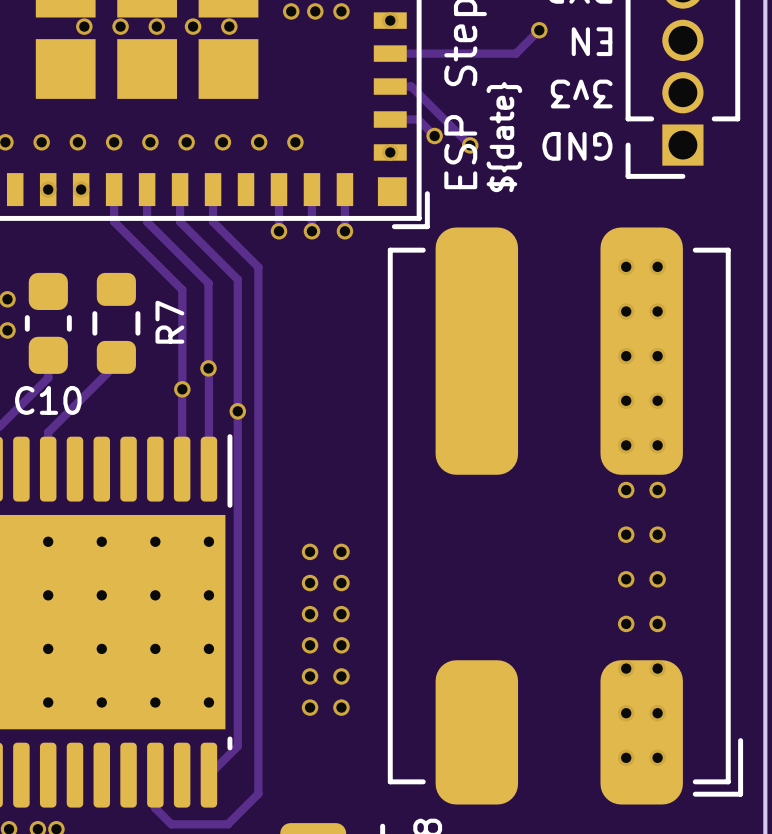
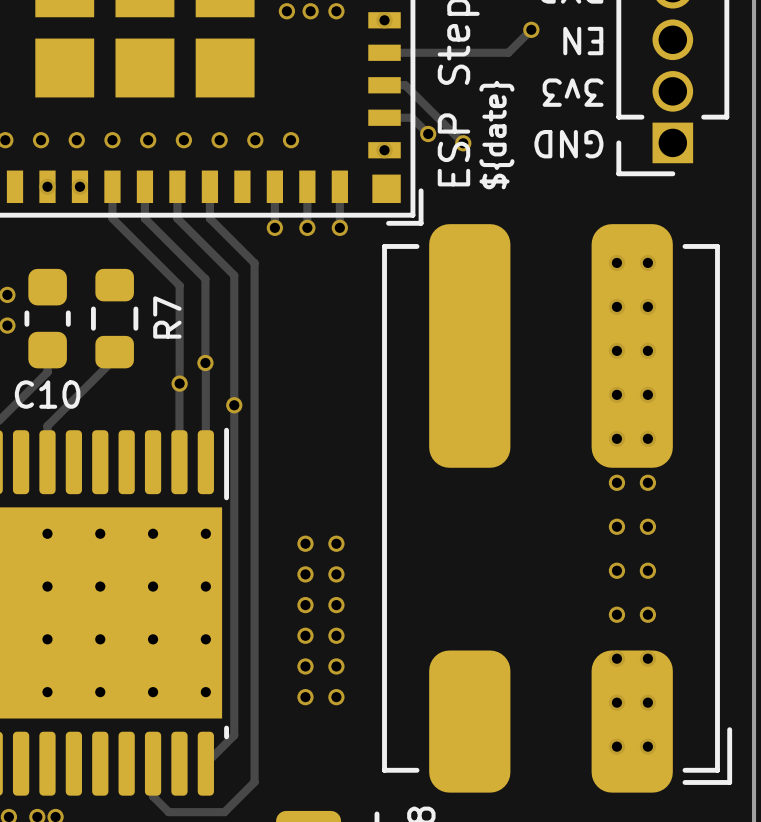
via: (84, 26) -> none
via: (120, 26) -> none
via: (156, 26) -> none
via: (193, 26) -> none
via: (229, 26) -> none

